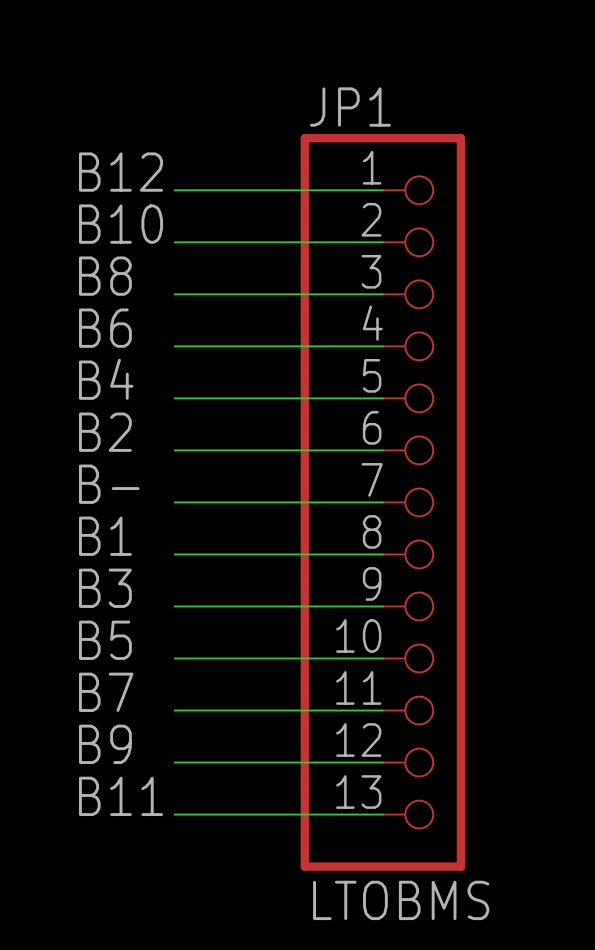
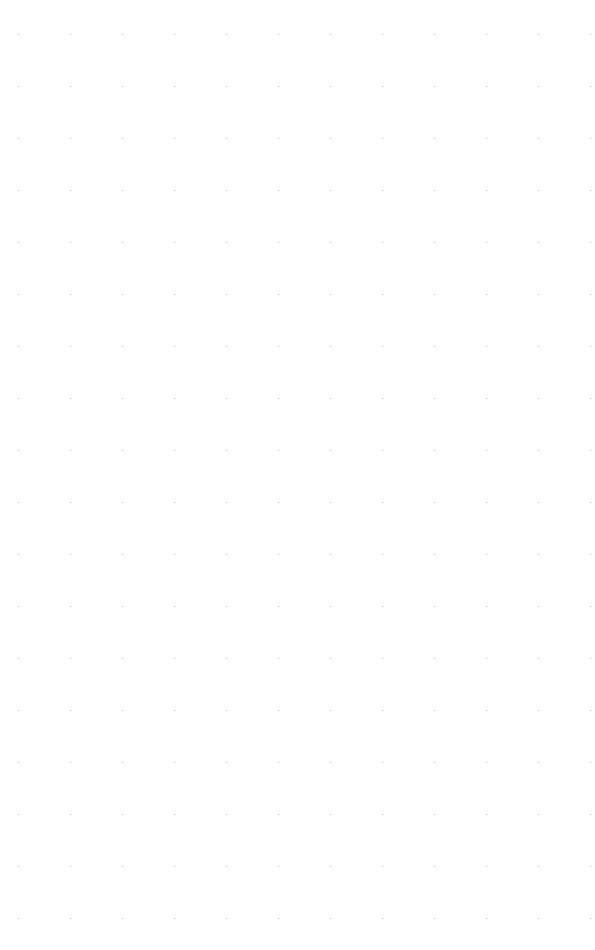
label: B12 (121, 172) -> none
wire: (174, 190) (382, 190) -> none
label: B10 (121, 224) -> none
wire: (174, 242) (382, 242) -> none
label: B8 (105, 276) -> none
wire: (174, 294) (382, 294) -> none
label: B6 (105, 328) -> none
wire: (174, 346) (382, 346) -> none
label: B4 (106, 379) -> none
wire: (174, 398) (382, 398) -> none
label: B2 (105, 432) -> none
wire: (174, 450) (382, 450) -> none
label: B- (109, 484) -> none
wire: (174, 502) (382, 502) -> none
JP1: LTOBMS (382, 502) -> none
label: B1 (105, 536) -> none
wire: (174, 554) (382, 554) -> none
label: B3 (105, 588) -> none
wire: (174, 606) (382, 606) -> none
label: B5 (105, 640) -> none
wire: (174, 658) (382, 658) -> none
label: B7 (106, 692) -> none
wire: (174, 710) (382, 710) -> none
label: B9 (105, 744) -> none
wire: (174, 762) (382, 762) -> none
label: B11 (121, 796) -> none
wire: (174, 814) (382, 814) -> none

